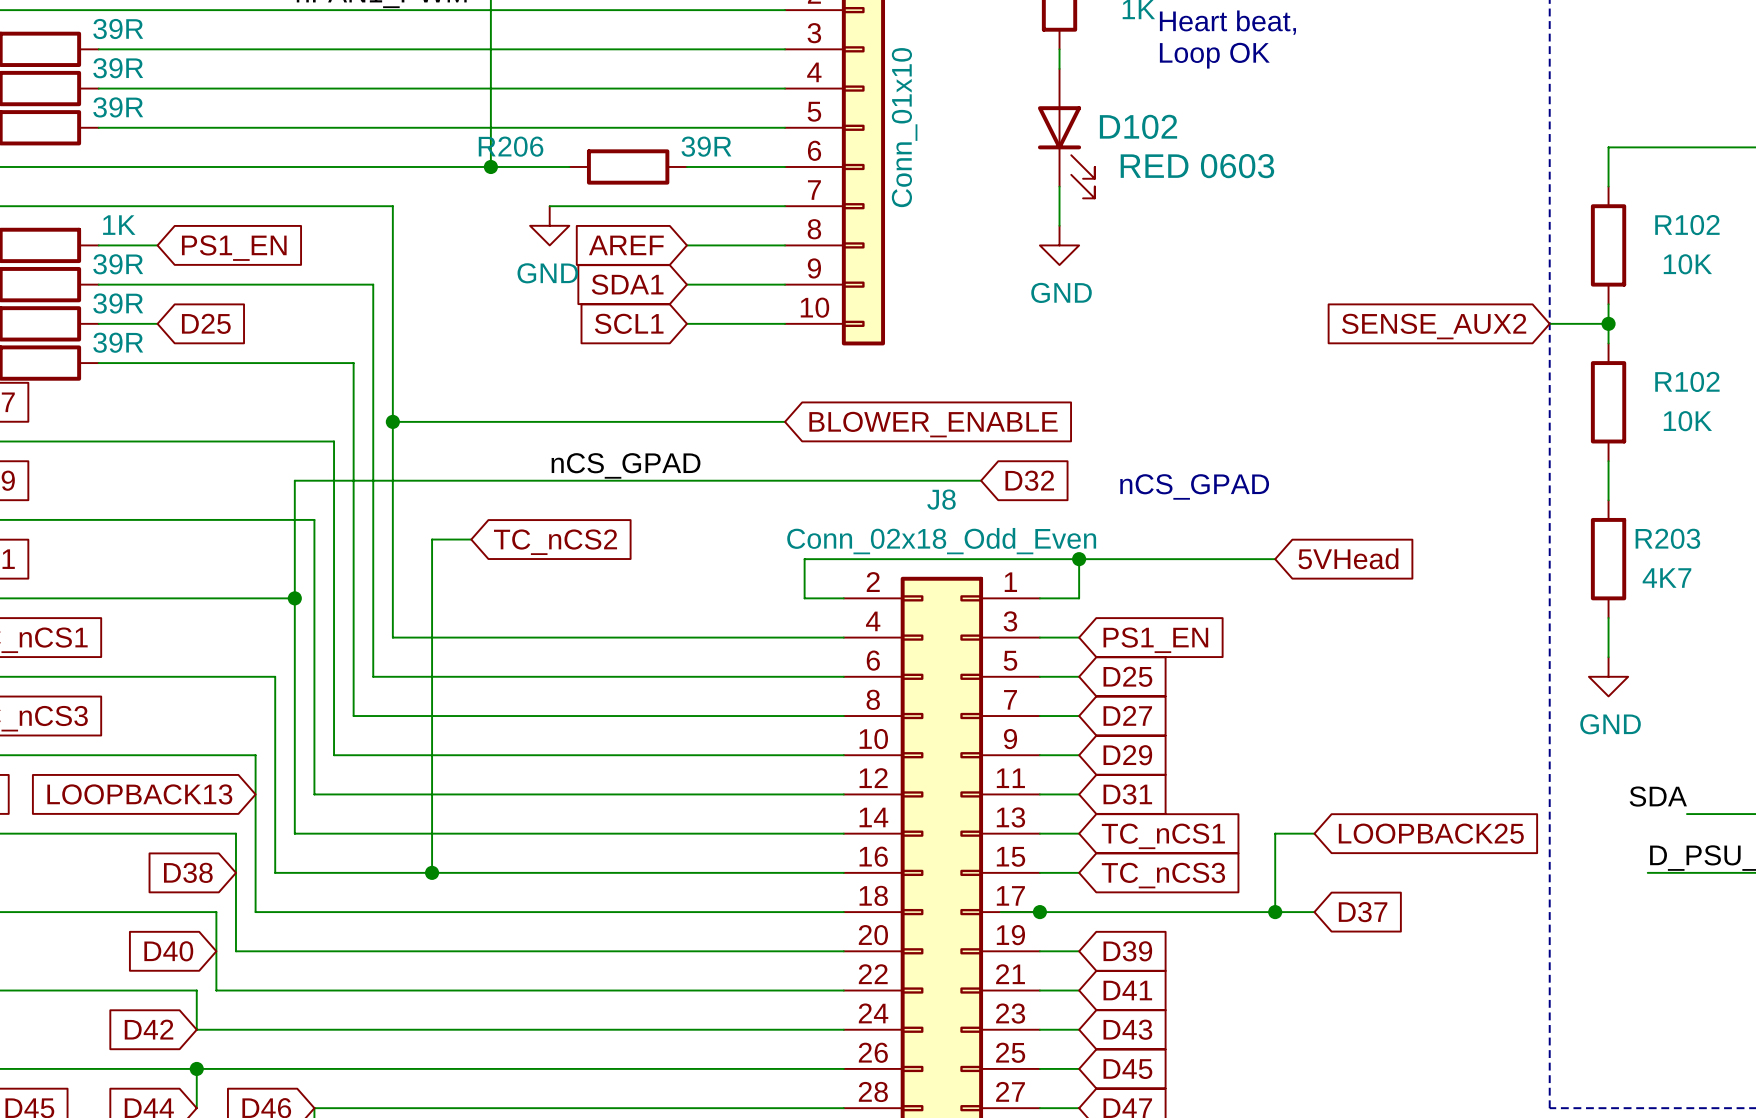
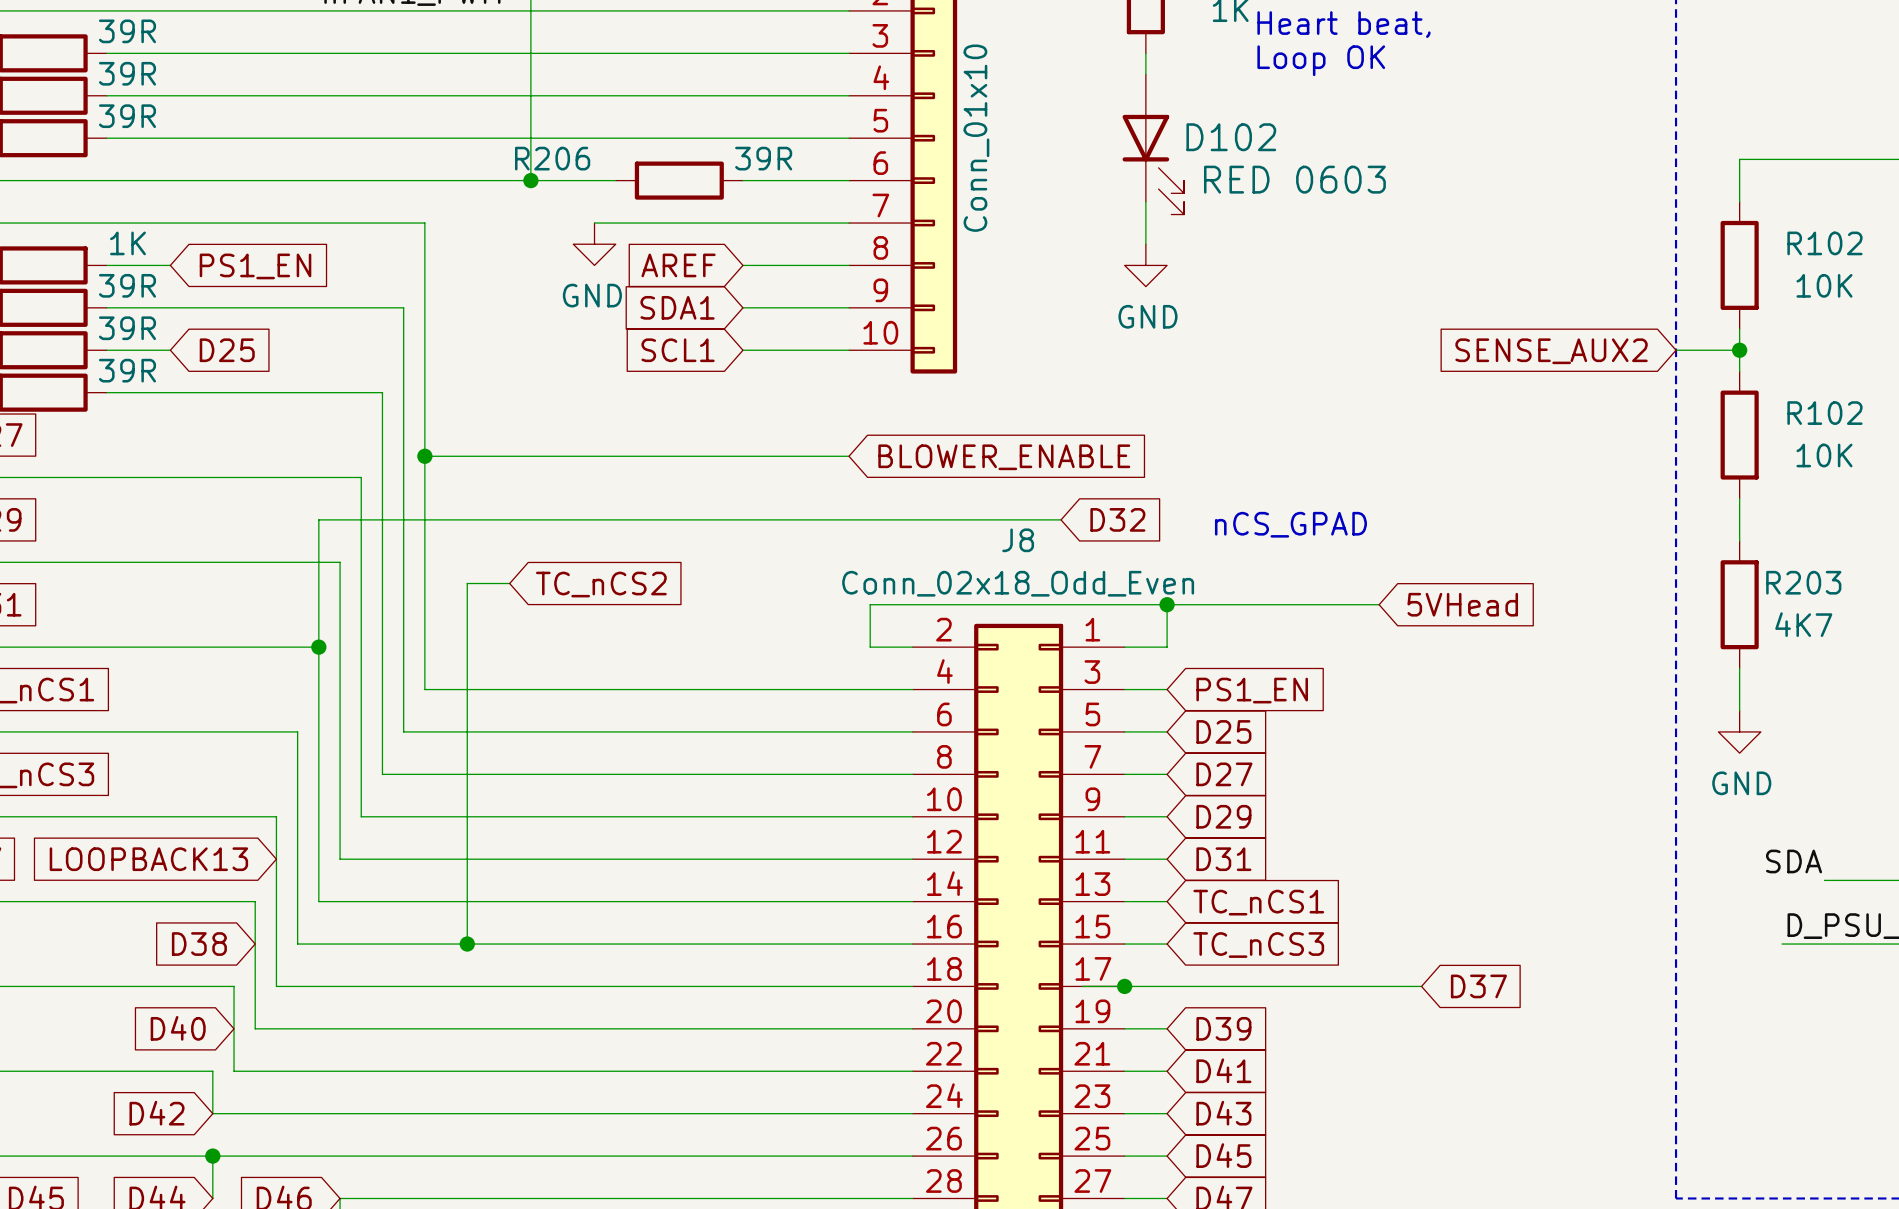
label: nCS_GPAD (626, 465) -> none
wire: (1314, 833) (1275, 833) (1275, 912) -> none
global label: LOOPBACK25 (1431, 833) -> none
junction: (1275, 912) -> none

